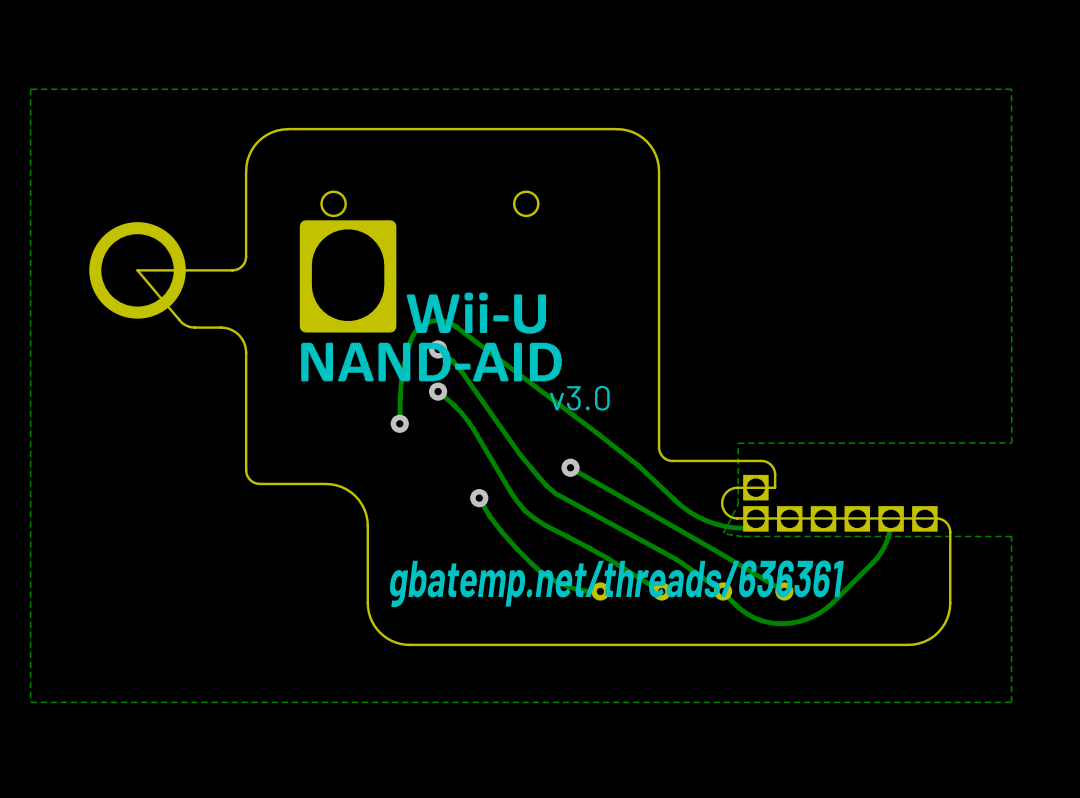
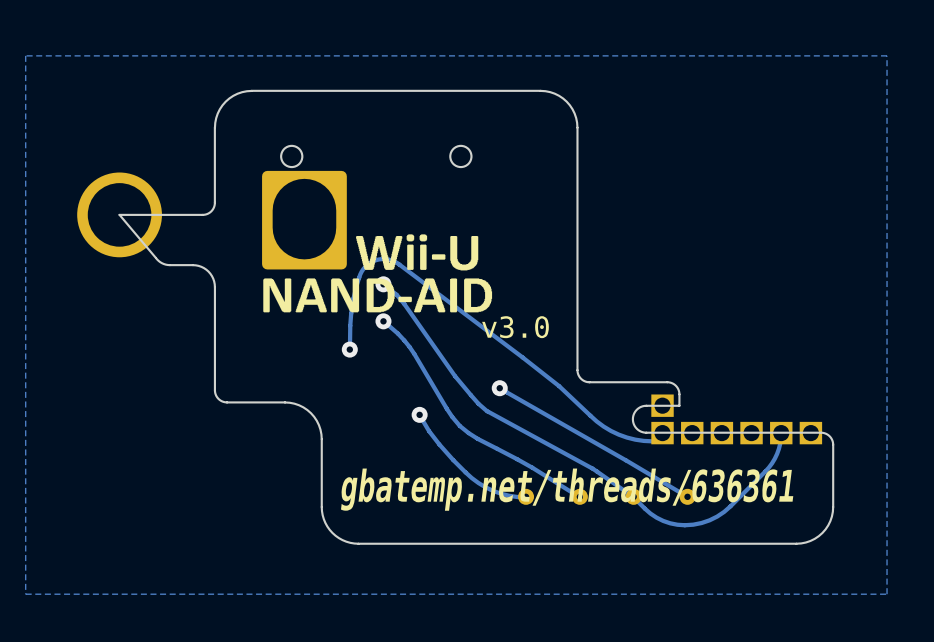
zone outline: (1011, 89) (1011, 443) (738, 443) (738, 504) (723, 533) (742, 536) (1011, 536) -> (887, 55) (887, 448)

